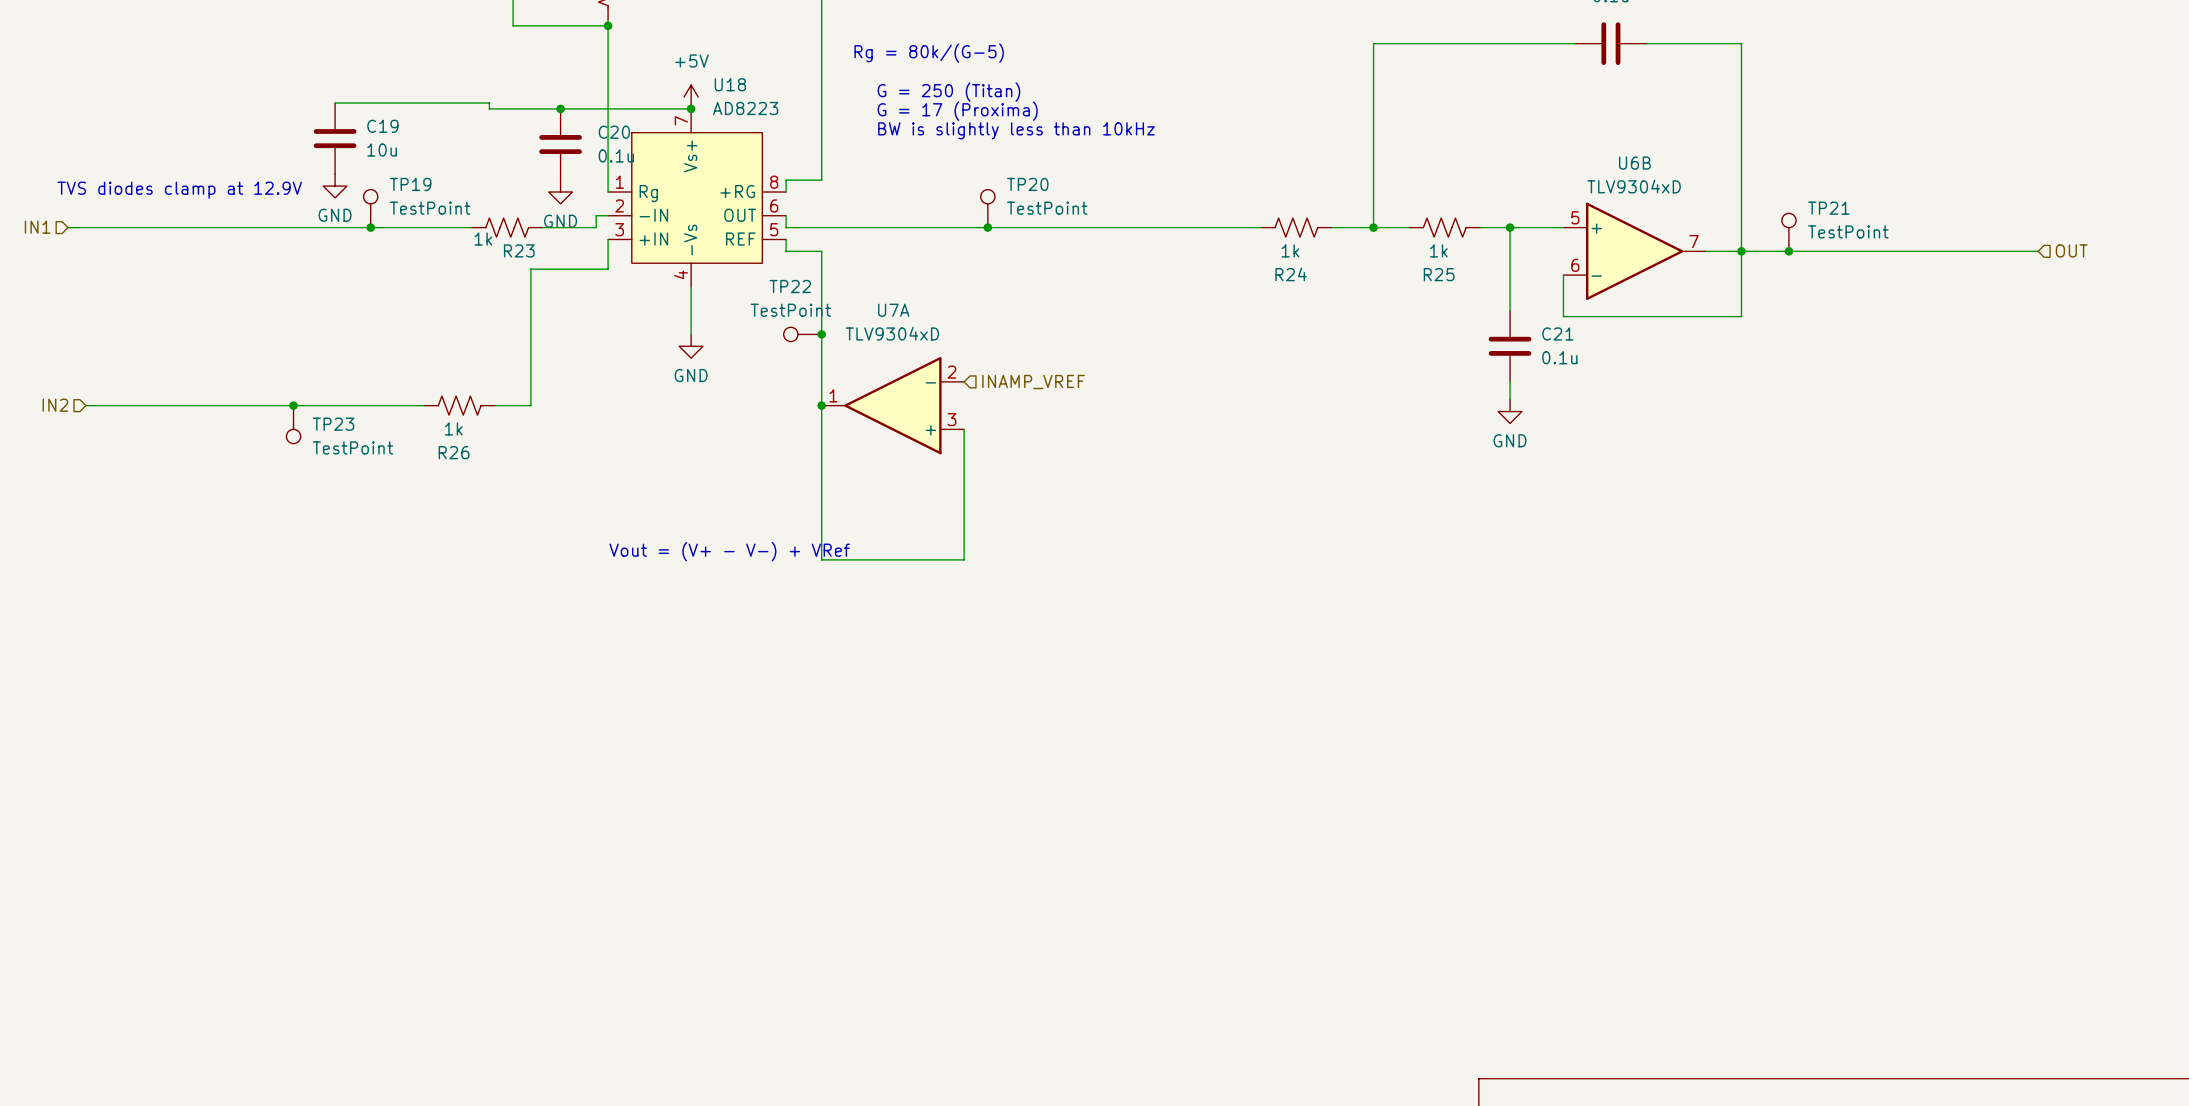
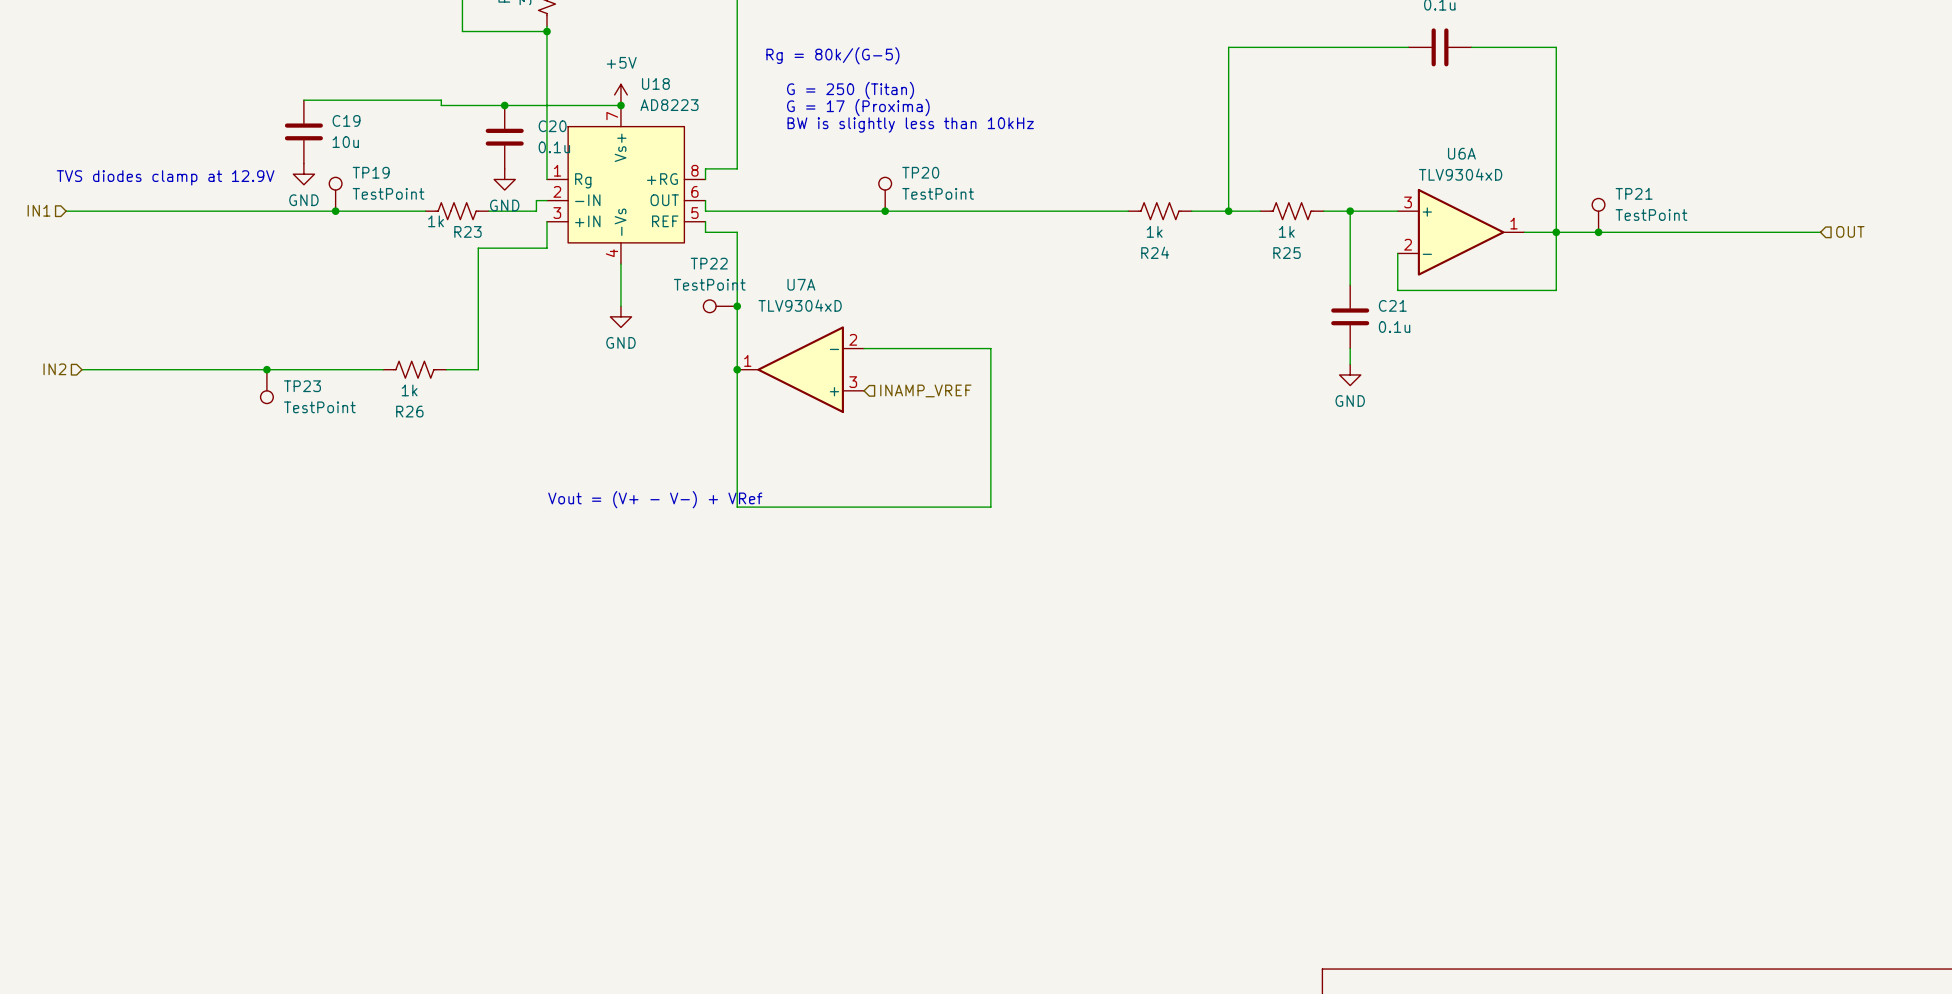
U6B name: U6B (1634, 163) -> U6A (1461, 153)
U6B pin number: 5 (1575, 217) -> 3 (1408, 202)
U6B pin number: 7 (1694, 241) -> 1 (1514, 223)
U6B pin number: 6 (1575, 265) -> 2 (1408, 244)
hierarchical label position: INAMP_VREF (1033, 382) -> INAMP_VREF (925, 390)
wire: (964, 429) (964, 559) -> (864, 348) (990, 348) (990, 507) (864, 507)

